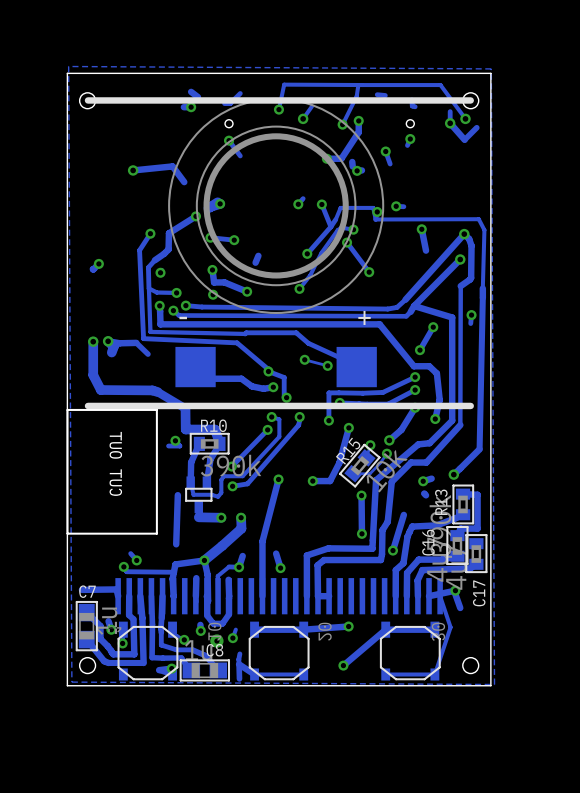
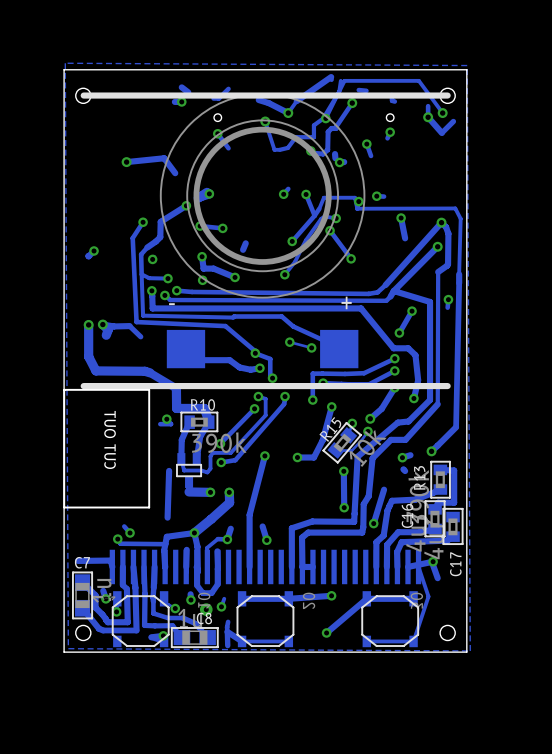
track: none -> (331, 79) (331, 77) (296, 101)
track: (362, 85) (284, 84) (278, 109) -> (344, 80) (322, 118) (313, 125) (313, 137) (295, 137) (287, 147) (274, 149) (265, 121)
track: none -> (258, 100) (288, 113)
track: none -> (352, 103) (336, 128) (331, 128) (328, 131) (327, 149) (323, 154) (310, 152)
via: none -> (352, 103)
via: (278, 109) -> none
track: (358, 120) (358, 132) (341, 158) (326, 158) -> none
via: (358, 120) -> none
via: none -> (265, 121)

